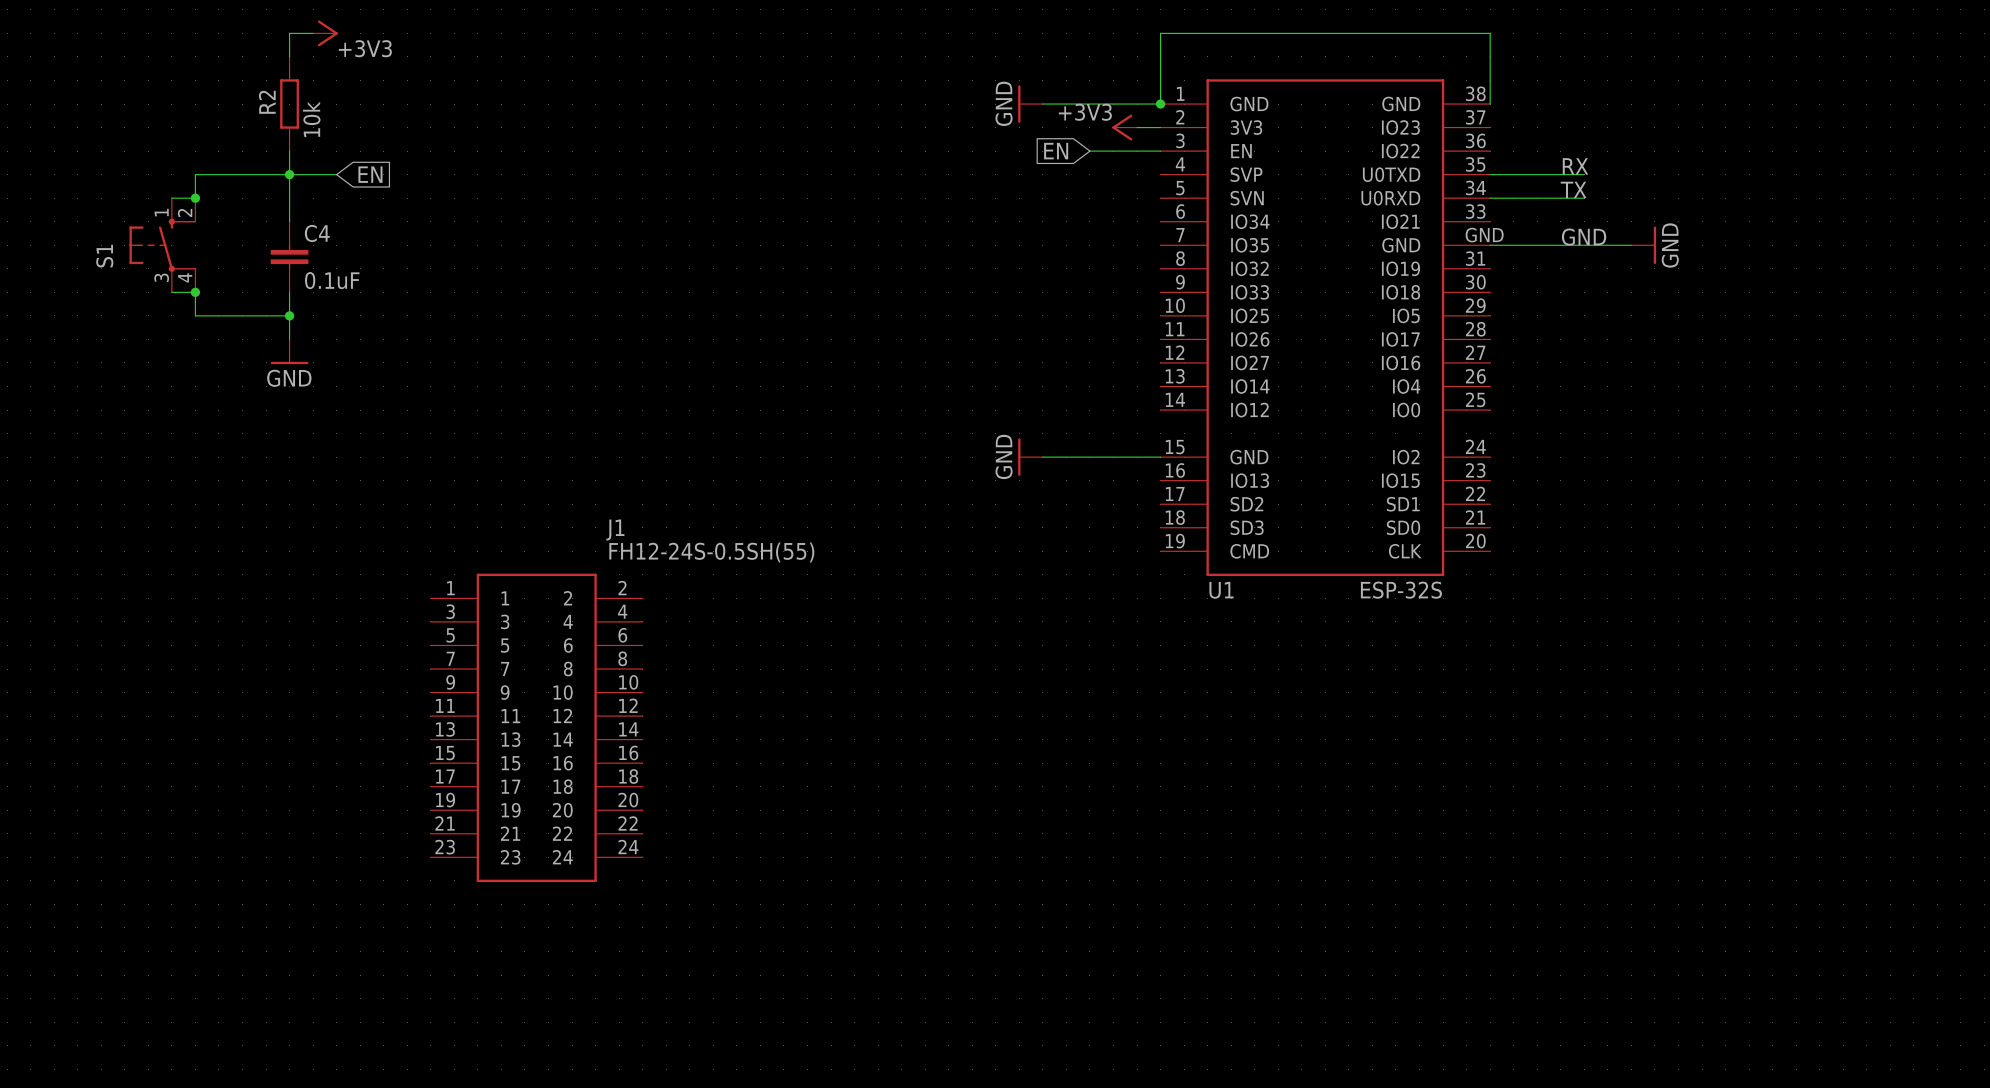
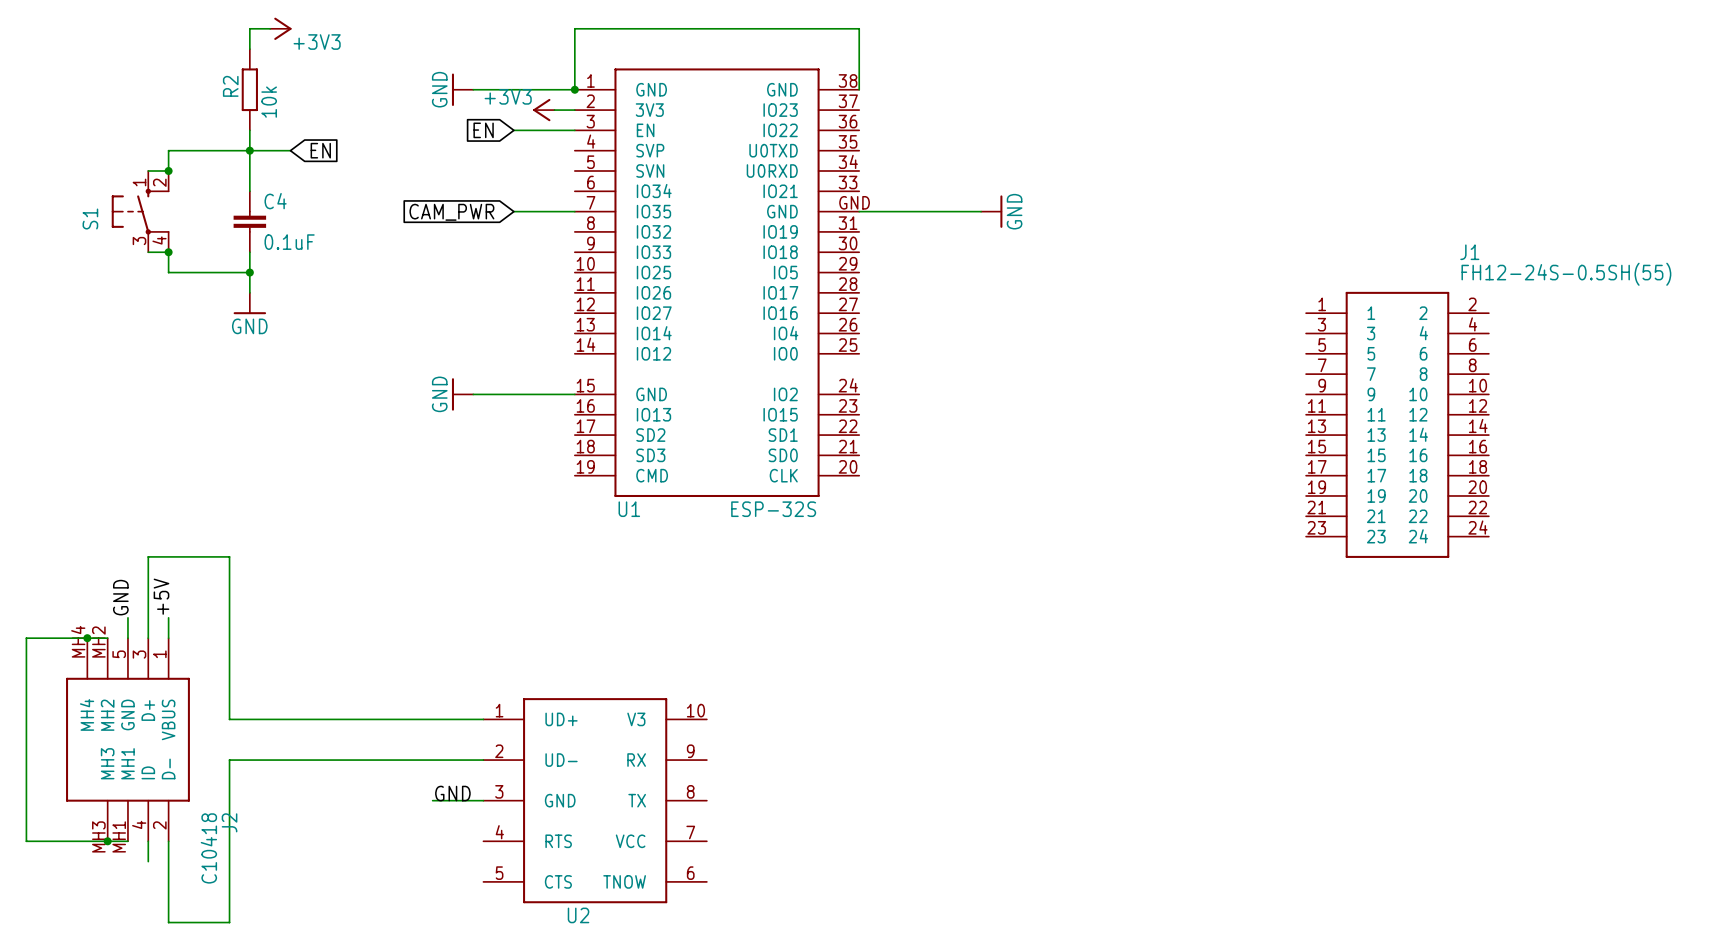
power symbol: none -> GND (462, 89)
wire: none -> (473, 89) (574, 89) (574, 28) (859, 28) (859, 89)
junction: none -> (574, 89)
power symbol: GND (1030, 104) -> none
wire: (1042, 104) (1160, 104) (1160, 33) (1490, 33) (1490, 104) -> none
junction: (1160, 104) -> none
power symbol: none -> +3V3 (543, 110)
wire: none -> (554, 110) (574, 110)
power symbol: +3V3 (1124, 127) -> none
wire: (1137, 127) (1160, 127) -> none
global label: none -> EN (483, 130)
wire: none -> (513, 130) (574, 130)
global label: EN (1056, 151) -> none
wire: (1089, 151) (1160, 151) -> none
label: RX (1575, 166) -> none
wire: (1490, 174) (1584, 174) -> none
label: TX (1573, 189) -> none
wire: (1490, 198) (1584, 198) -> none
label: GND (1584, 237) -> none
wire: none -> (513, 211) (574, 211)
wire: none -> (859, 211) (981, 211)
power symbol: none -> GND (991, 211)
wire: (1490, 245) (1631, 245) -> none
power symbol: GND (1643, 245) -> none
global label: none -> CAM_PWR (451, 212)
U1 position: (1325, 327) -> (717, 282)
power symbol: none -> GND (462, 394)
wire: none -> (473, 394) (574, 394)
power symbol: GND (1030, 457) -> none
wire: (1042, 457) (1160, 457) -> none
label: none -> GND (120, 597)
label: none -> +5V (161, 596)
wire: none -> (127, 617) (127, 638)
wire: none -> (168, 617) (168, 638)
J1 position: (536, 727) -> (1397, 424)
junction: none -> (87, 638)
wire: none -> (107, 638) (26, 638) (26, 841) (127, 841)
wire: none -> (148, 638) (148, 556) (229, 556) (229, 719) (483, 719)
J2: none -> C10418 (127, 739)
wire: none -> (483, 760) (229, 760) (229, 922) (168, 922) (168, 841)
label: none -> GND (452, 793)
wire: none -> (432, 800) (483, 800)
U2: none -> (595, 800)
junction: none -> (107, 841)
wire: none -> (148, 841) (148, 861)

